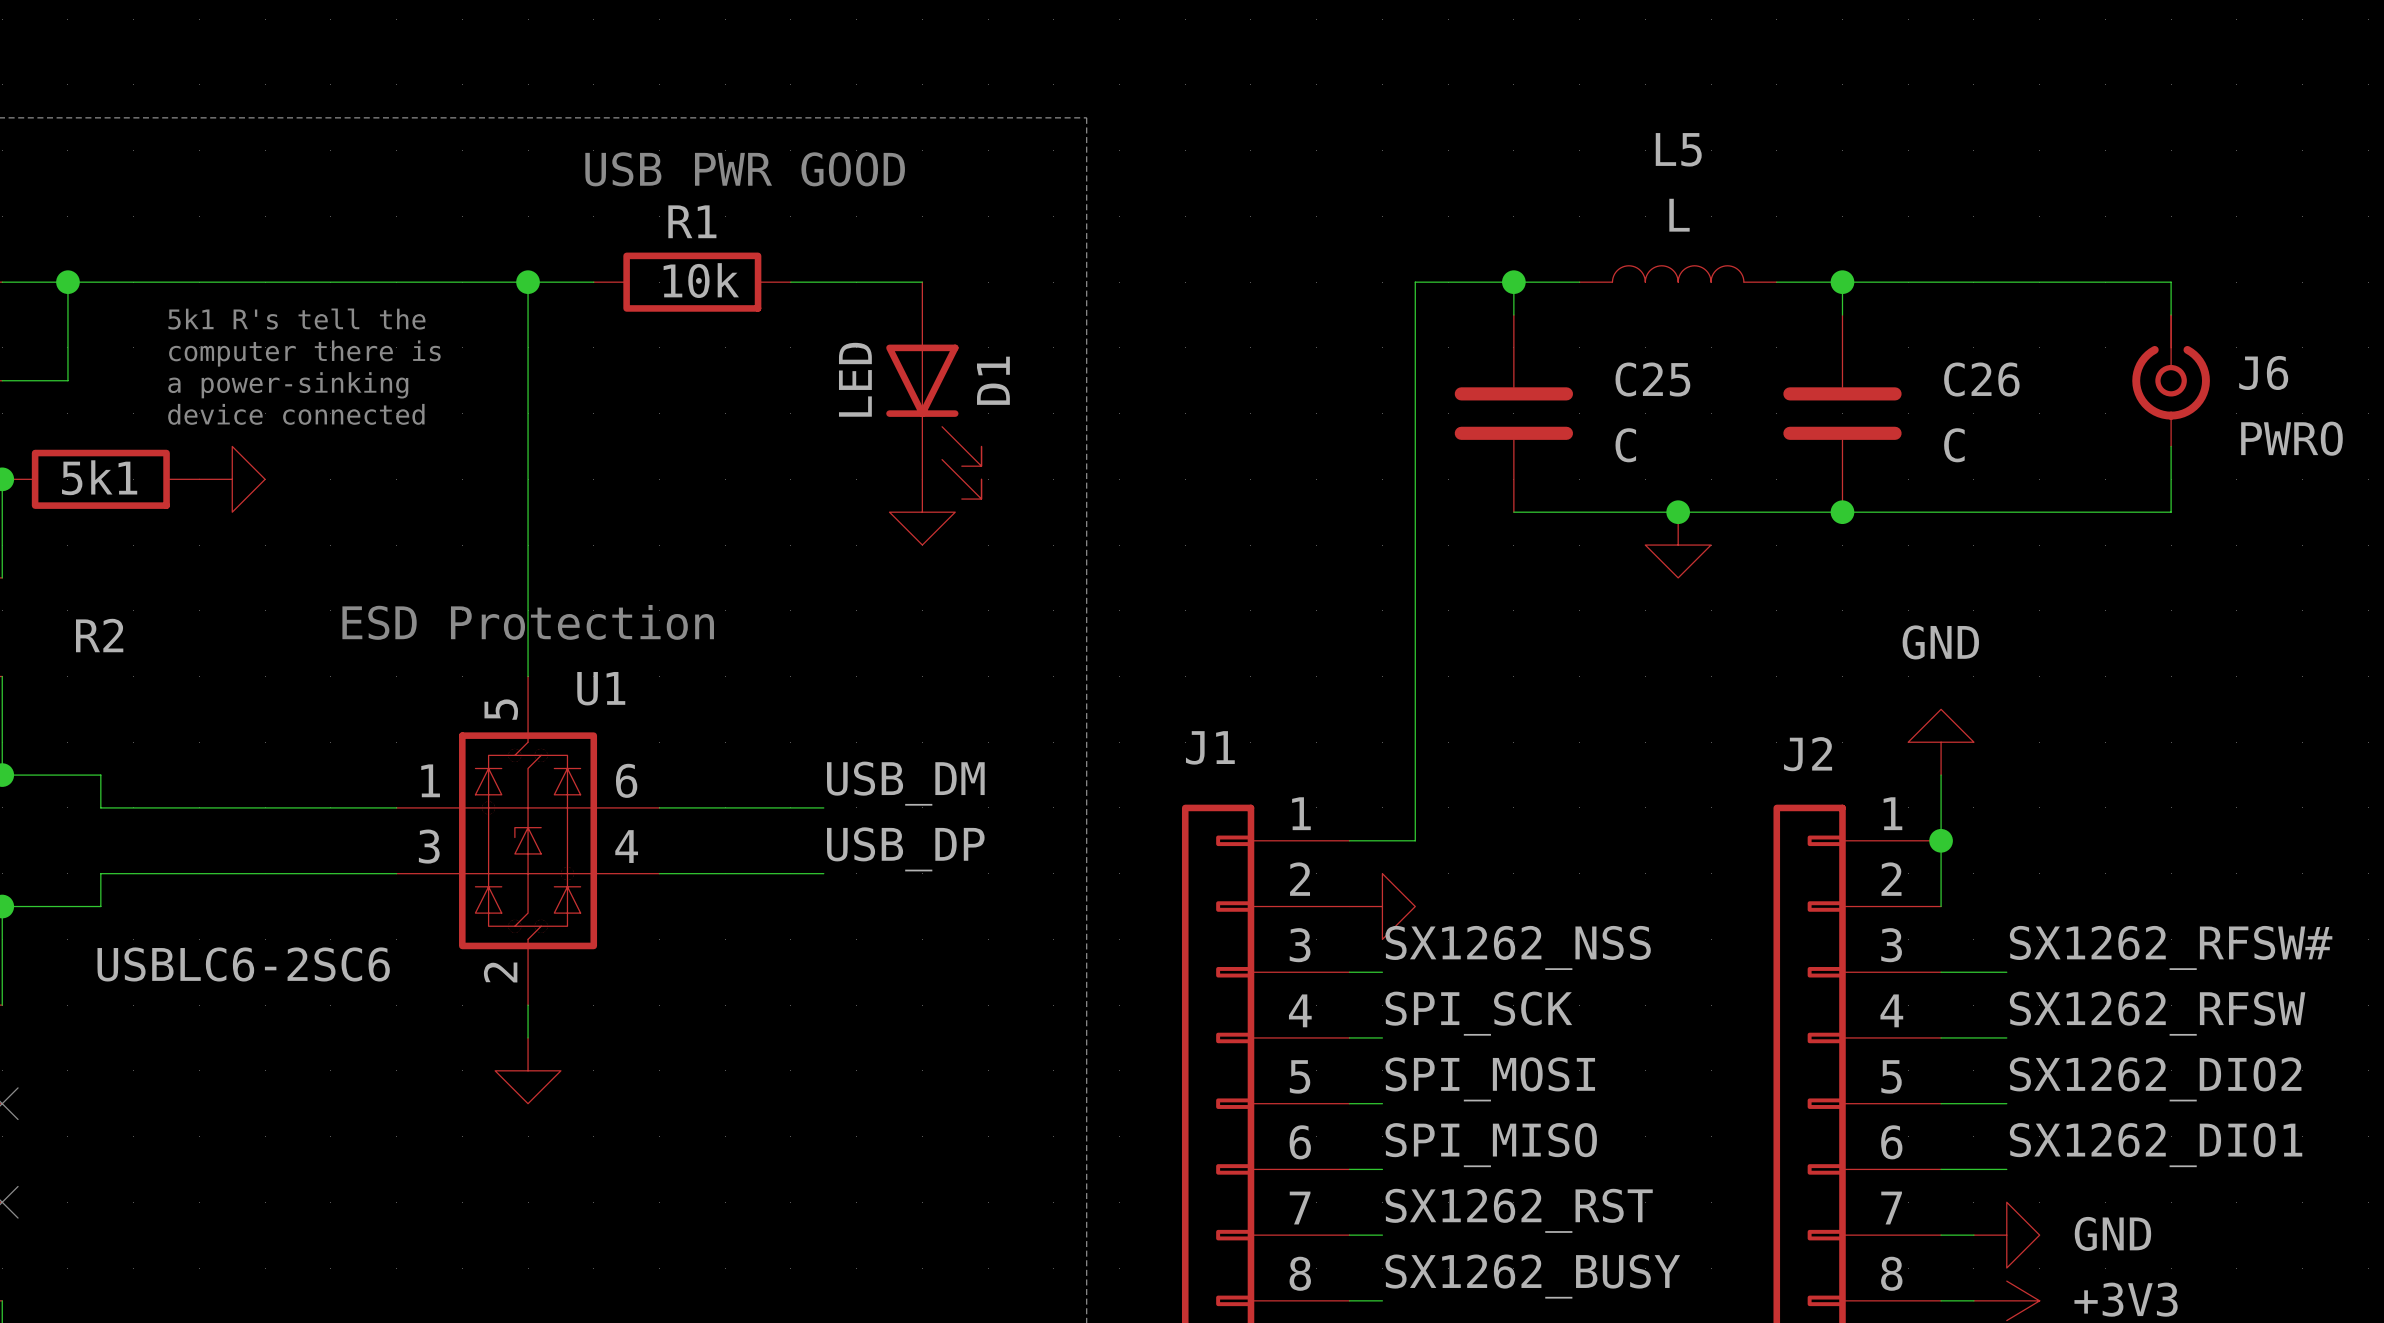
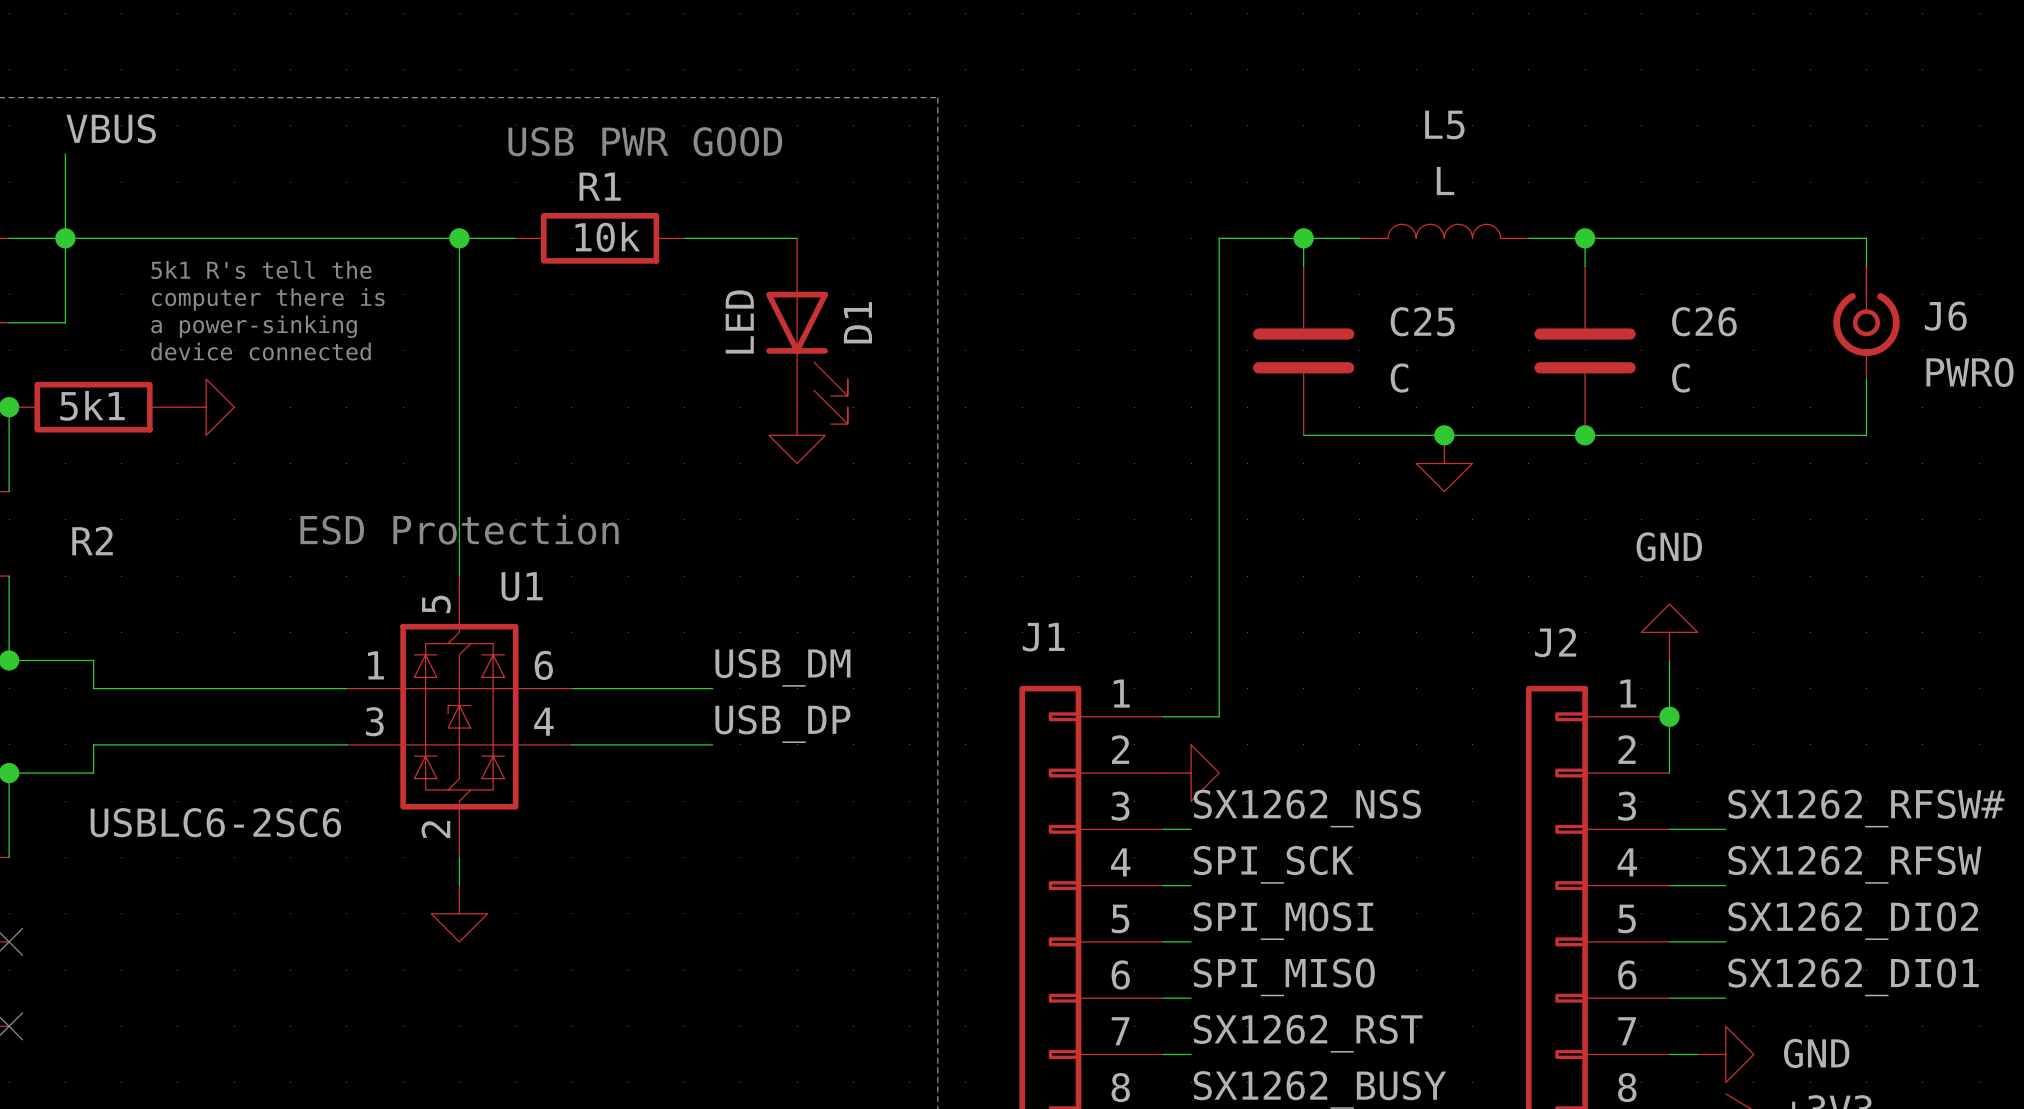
label: none -> VBUS (111, 128)
wire: none -> (65, 153) (65, 238)

